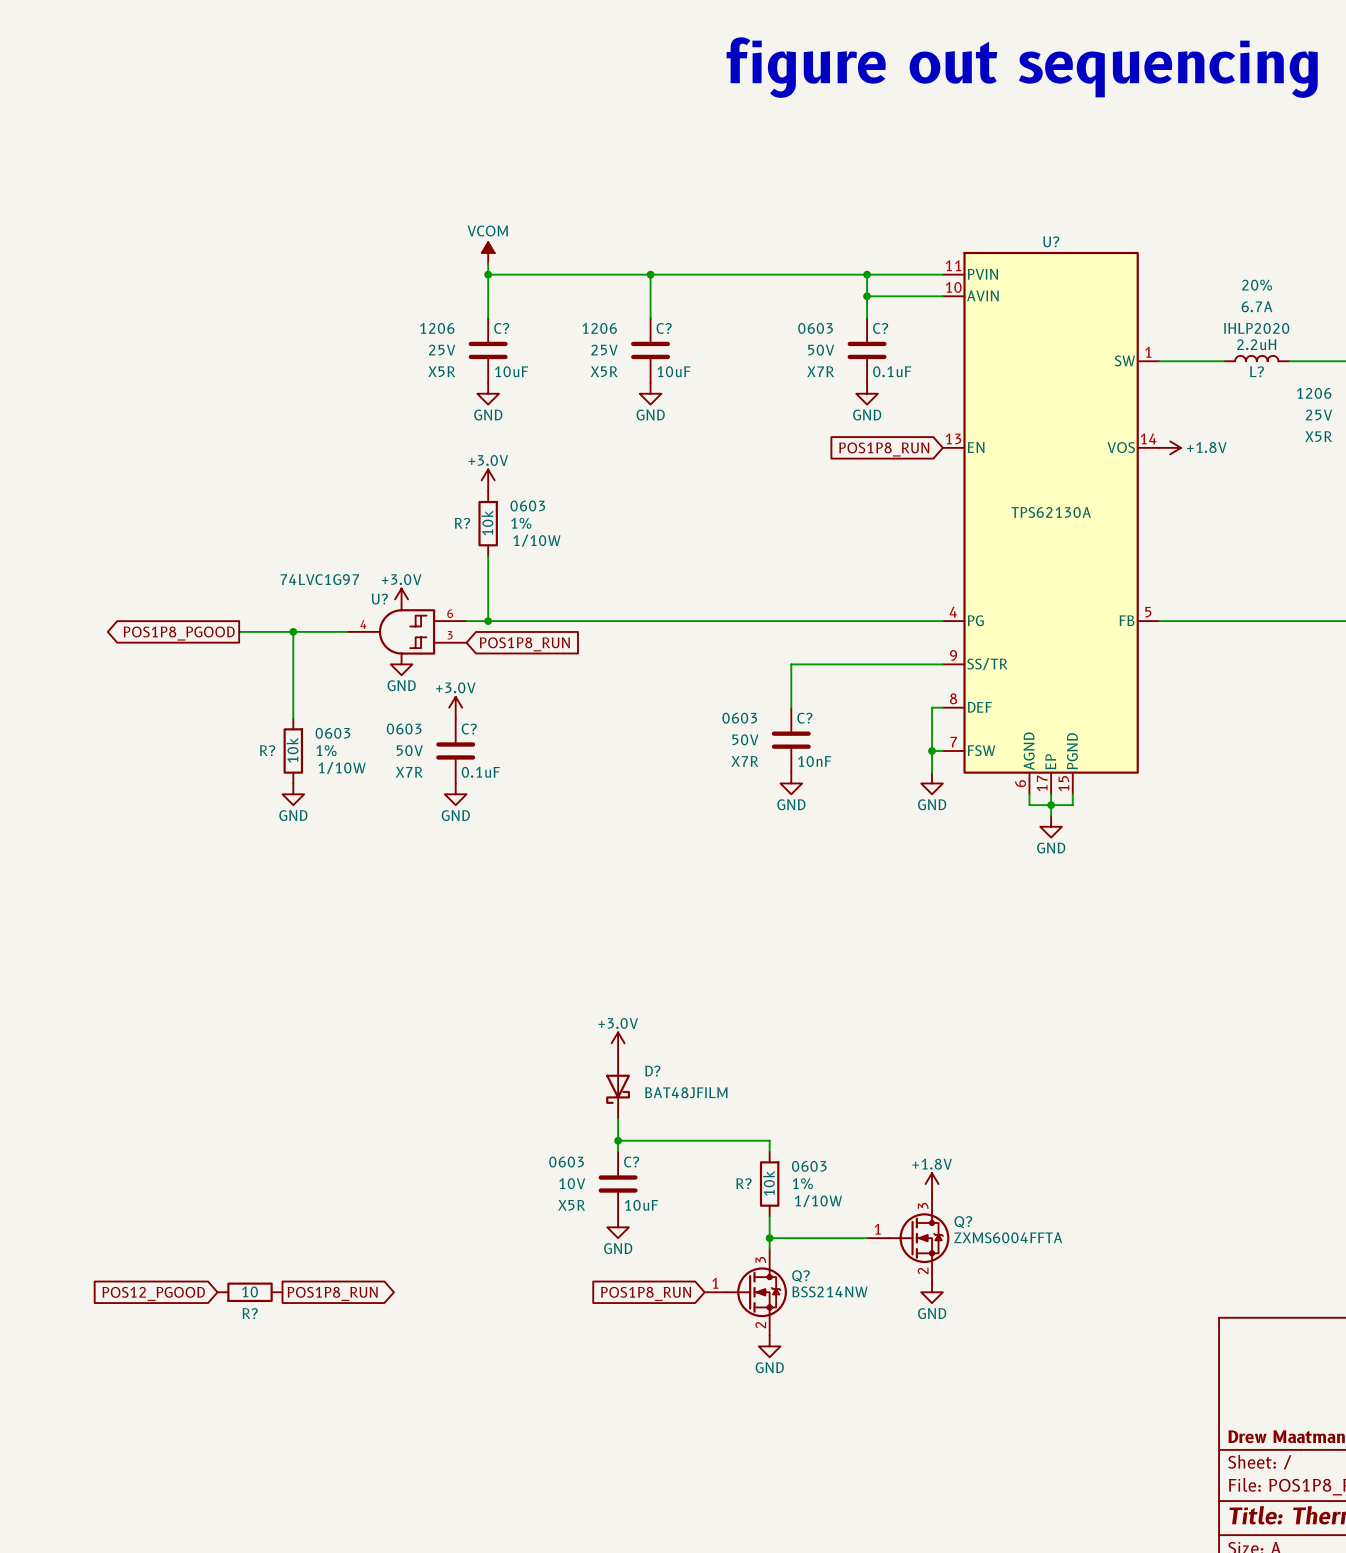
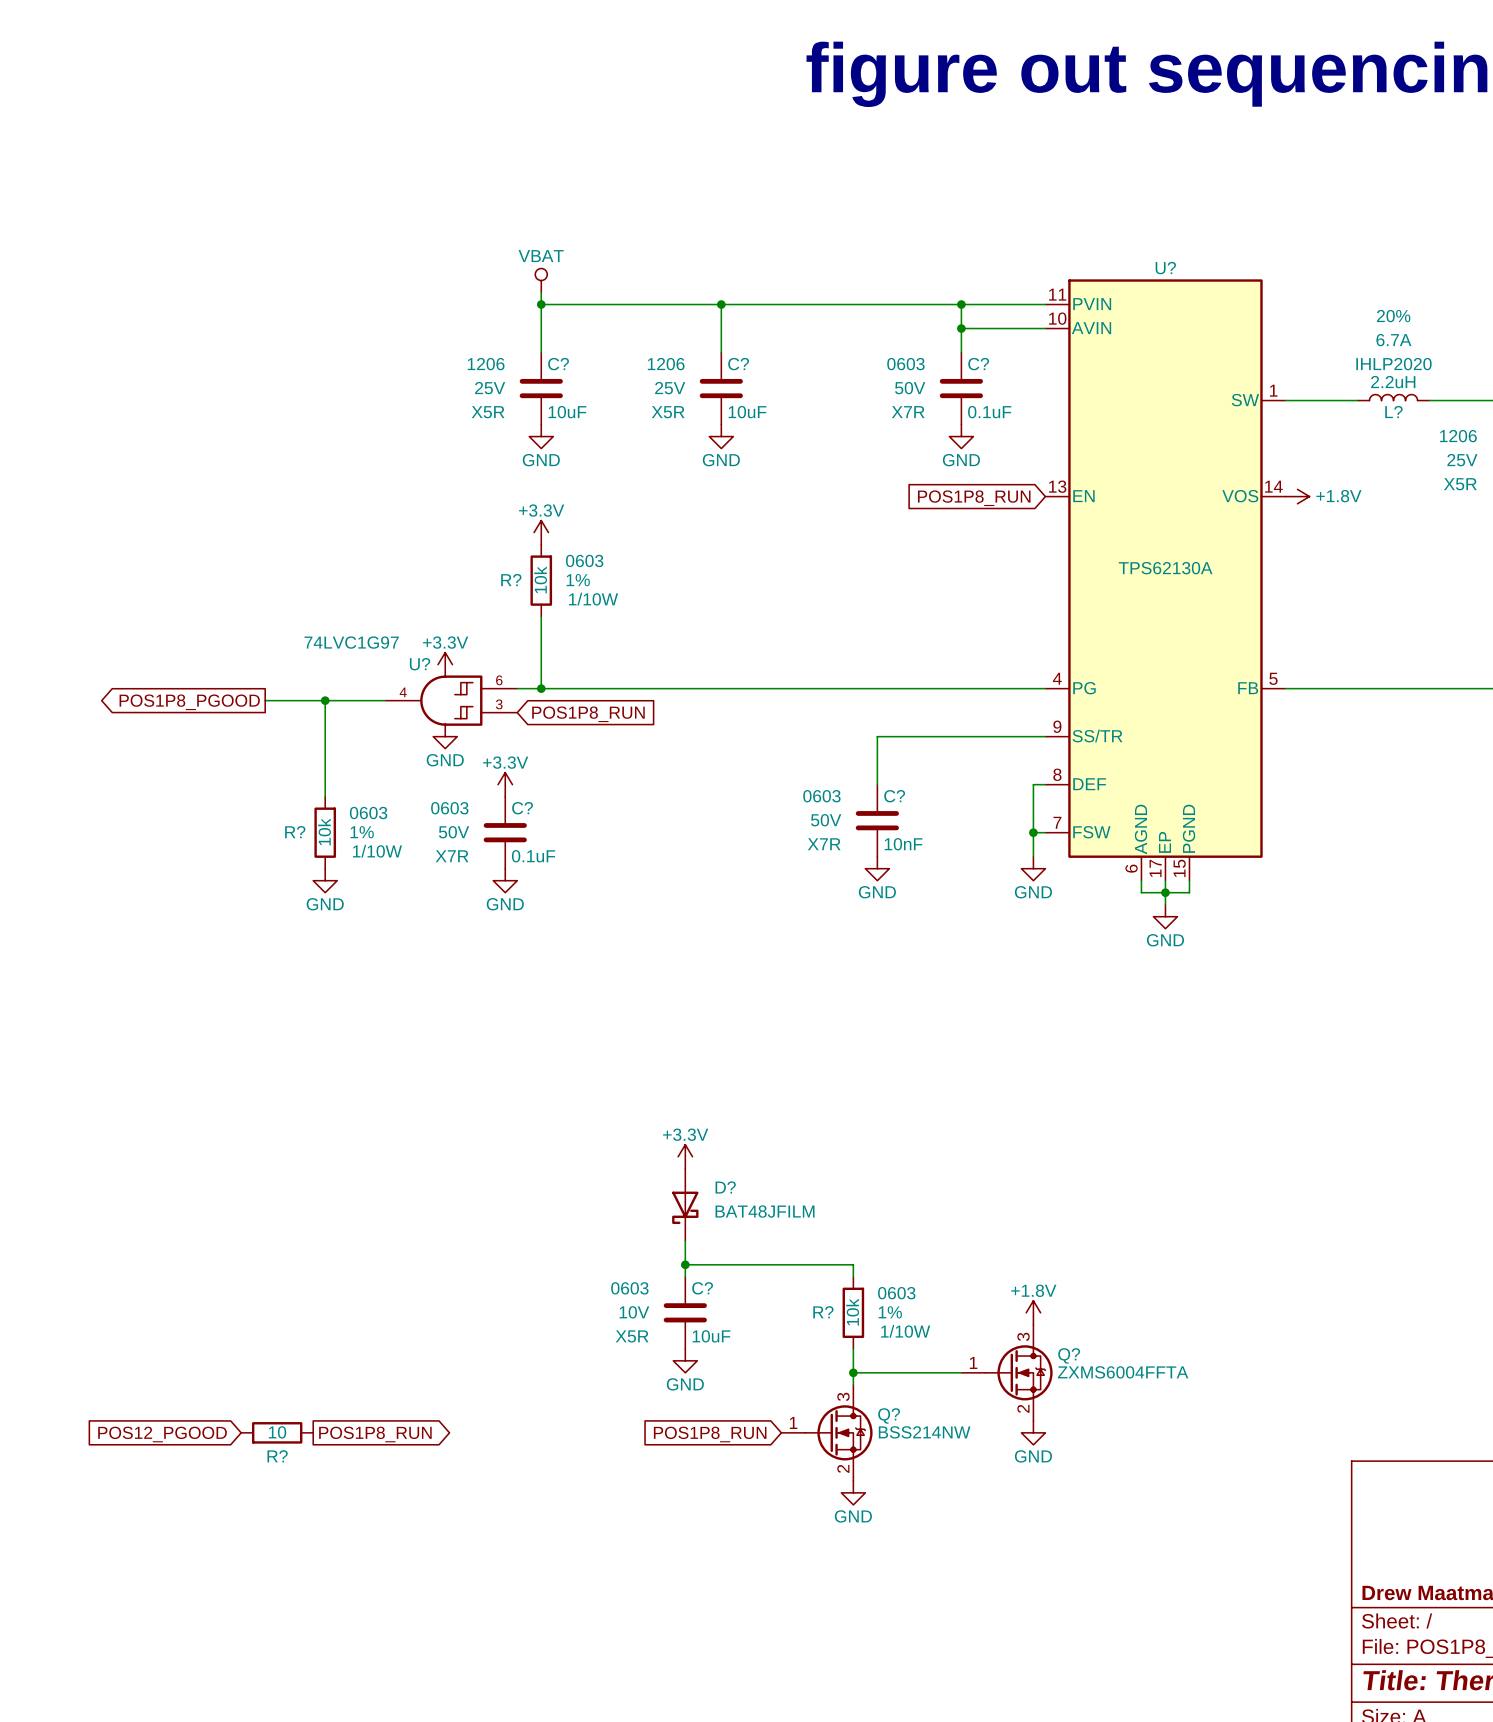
power symbol: VCOM (488, 253) -> VBAT (541, 280)
power symbol: +3.0V (488, 480) -> +3.3V (541, 532)
power symbol: +3.0V (401, 599) -> +3.3V (445, 664)
power symbol: +3.0V (455, 707) -> +3.3V (505, 784)
power symbol: +3.0V (618, 1043) -> +3.3V (685, 1156)

